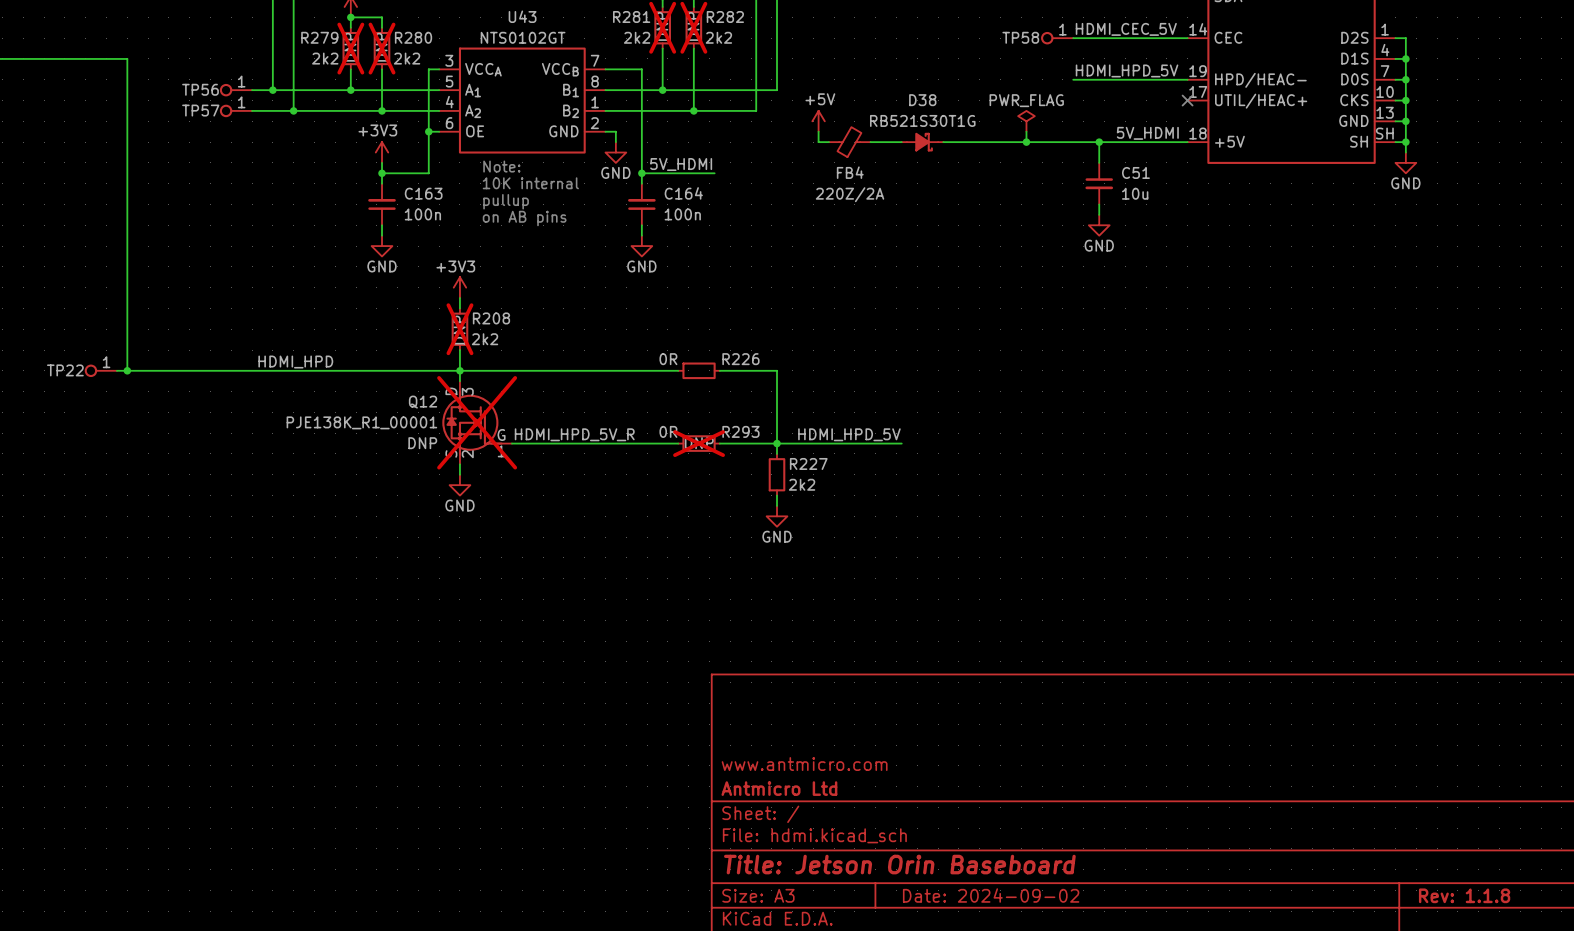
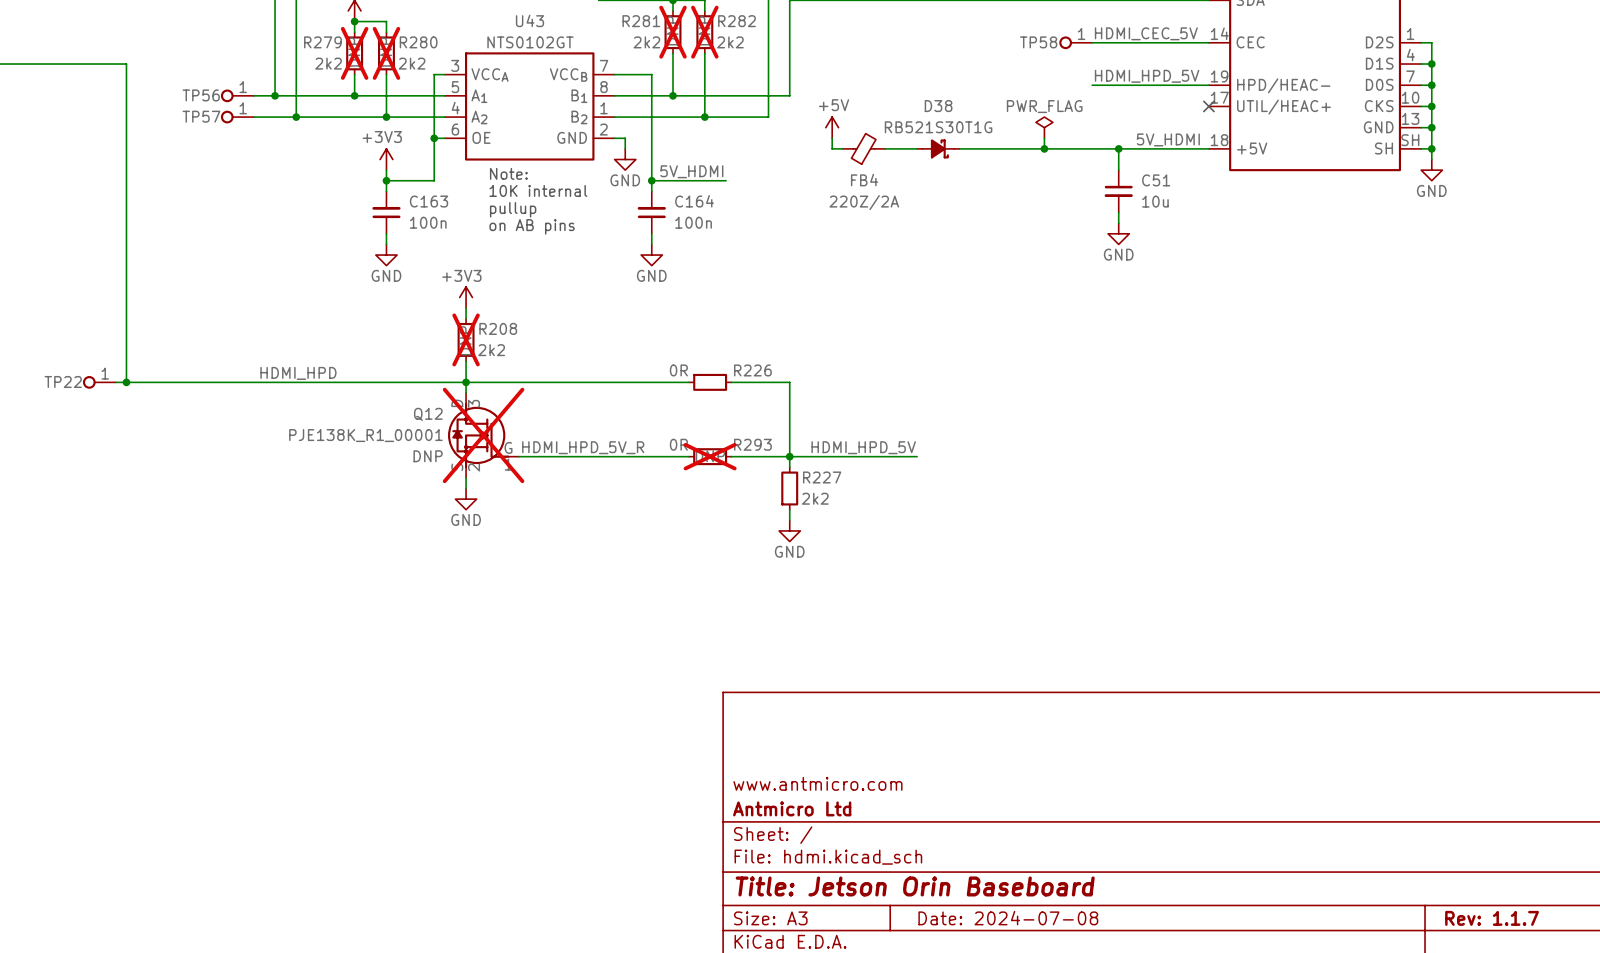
title block: Date: 2024-09-02 (991, 895) -> Date: 2024-07-08 (1008, 918)
title block: Rev: 1.1.8 (1464, 895) -> Rev: 1.1.7 (1492, 918)

